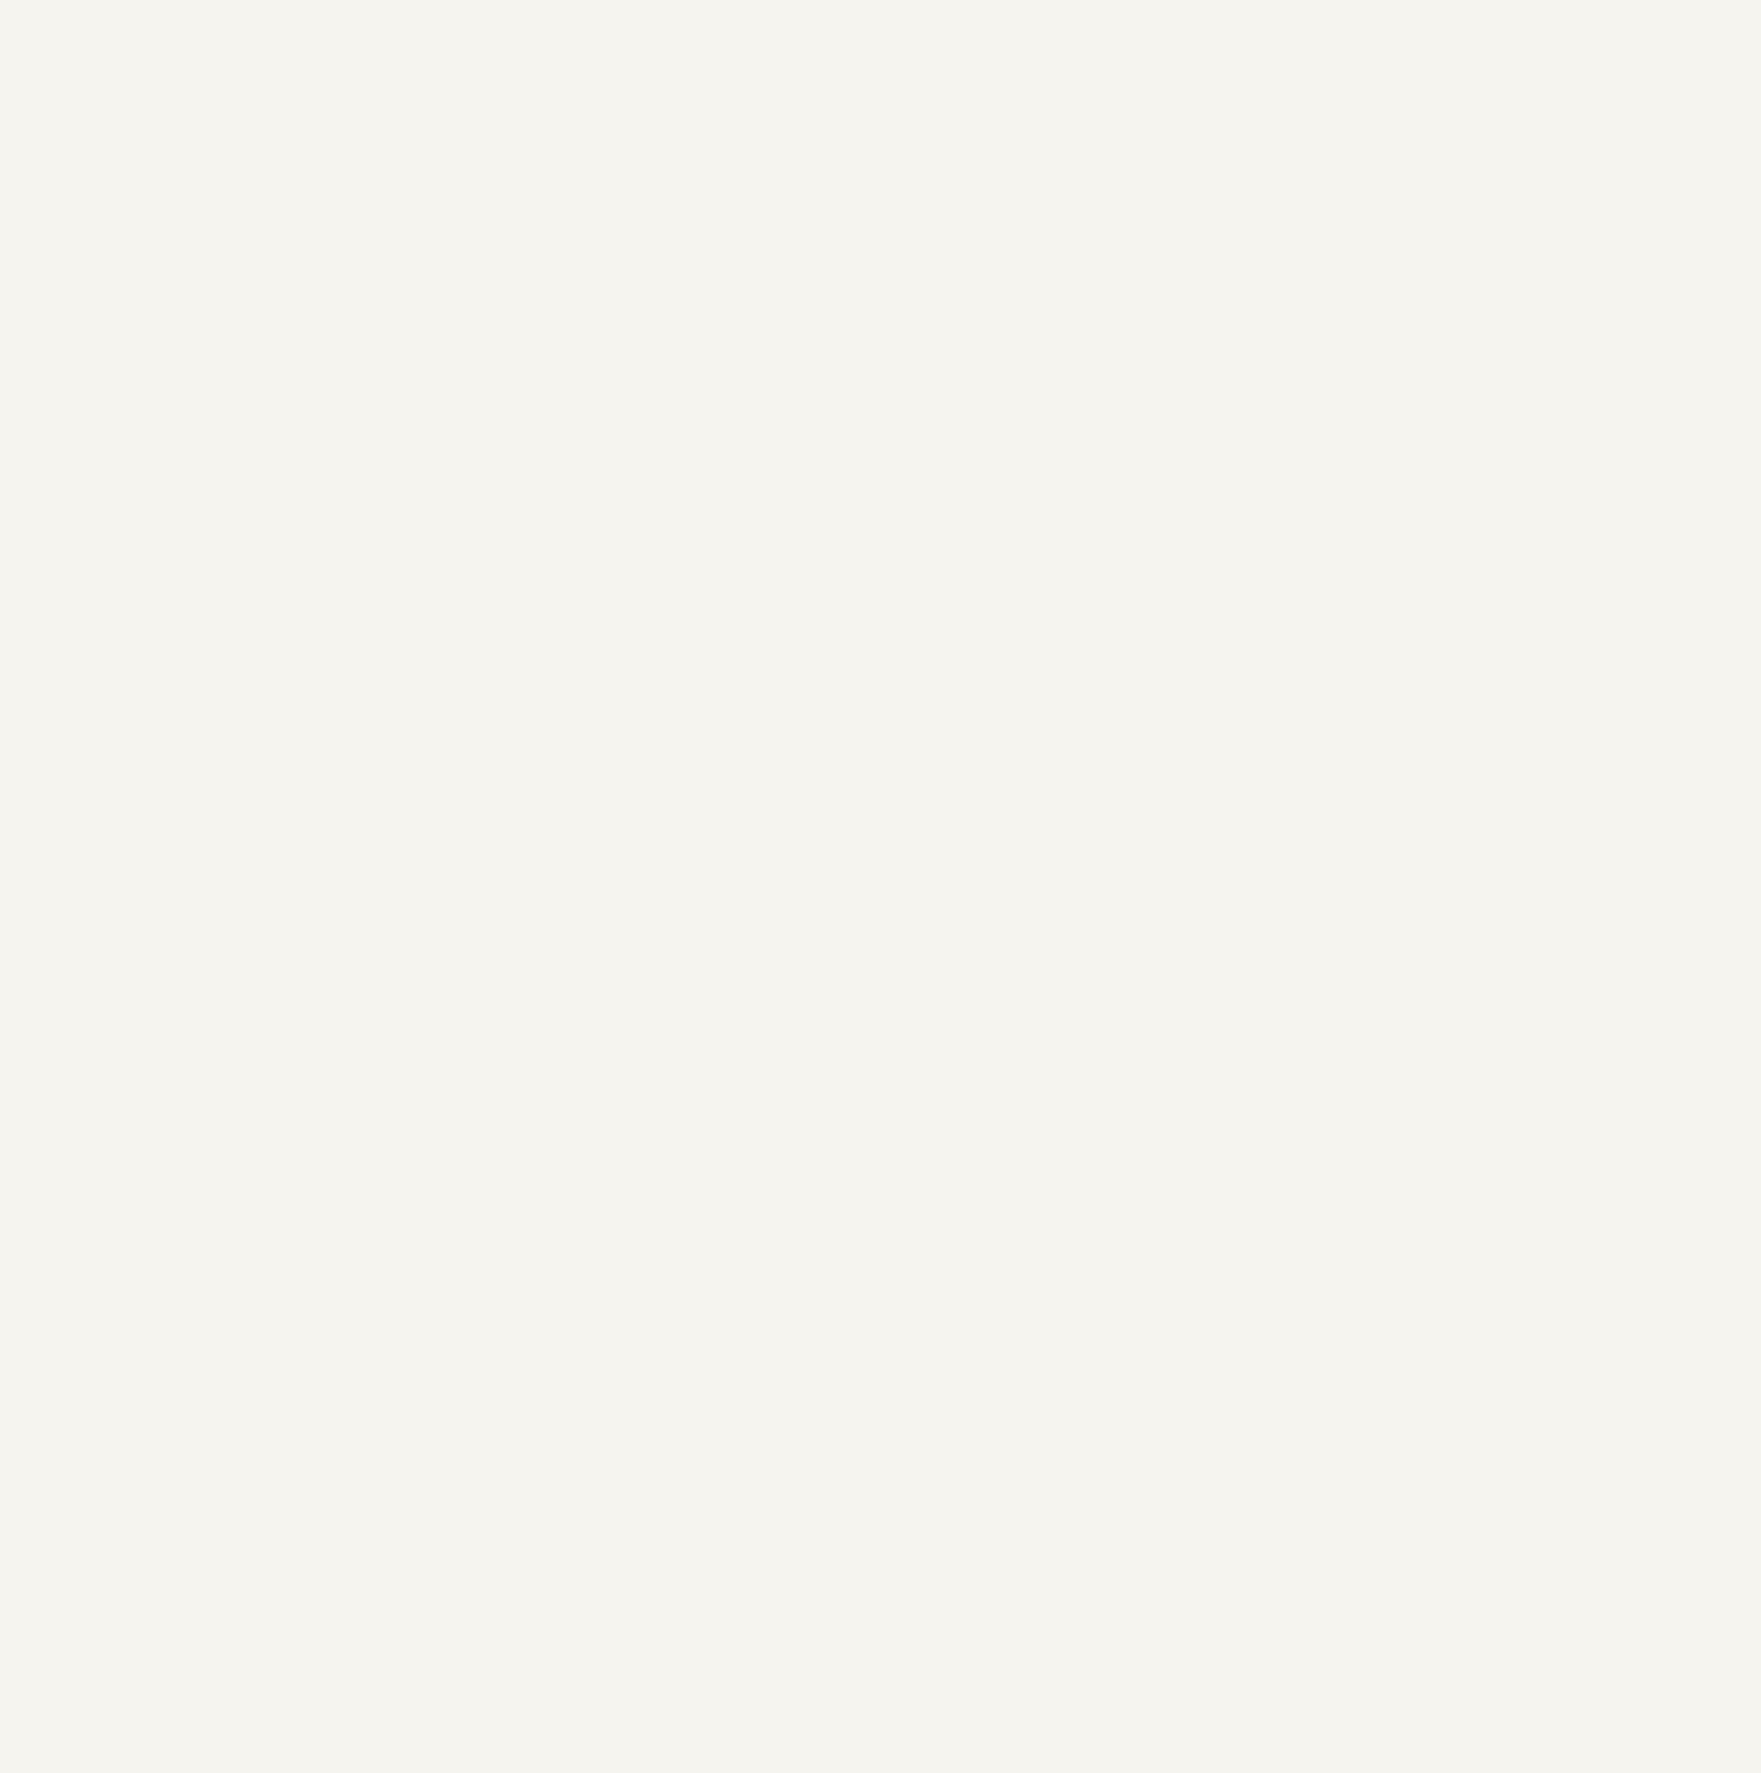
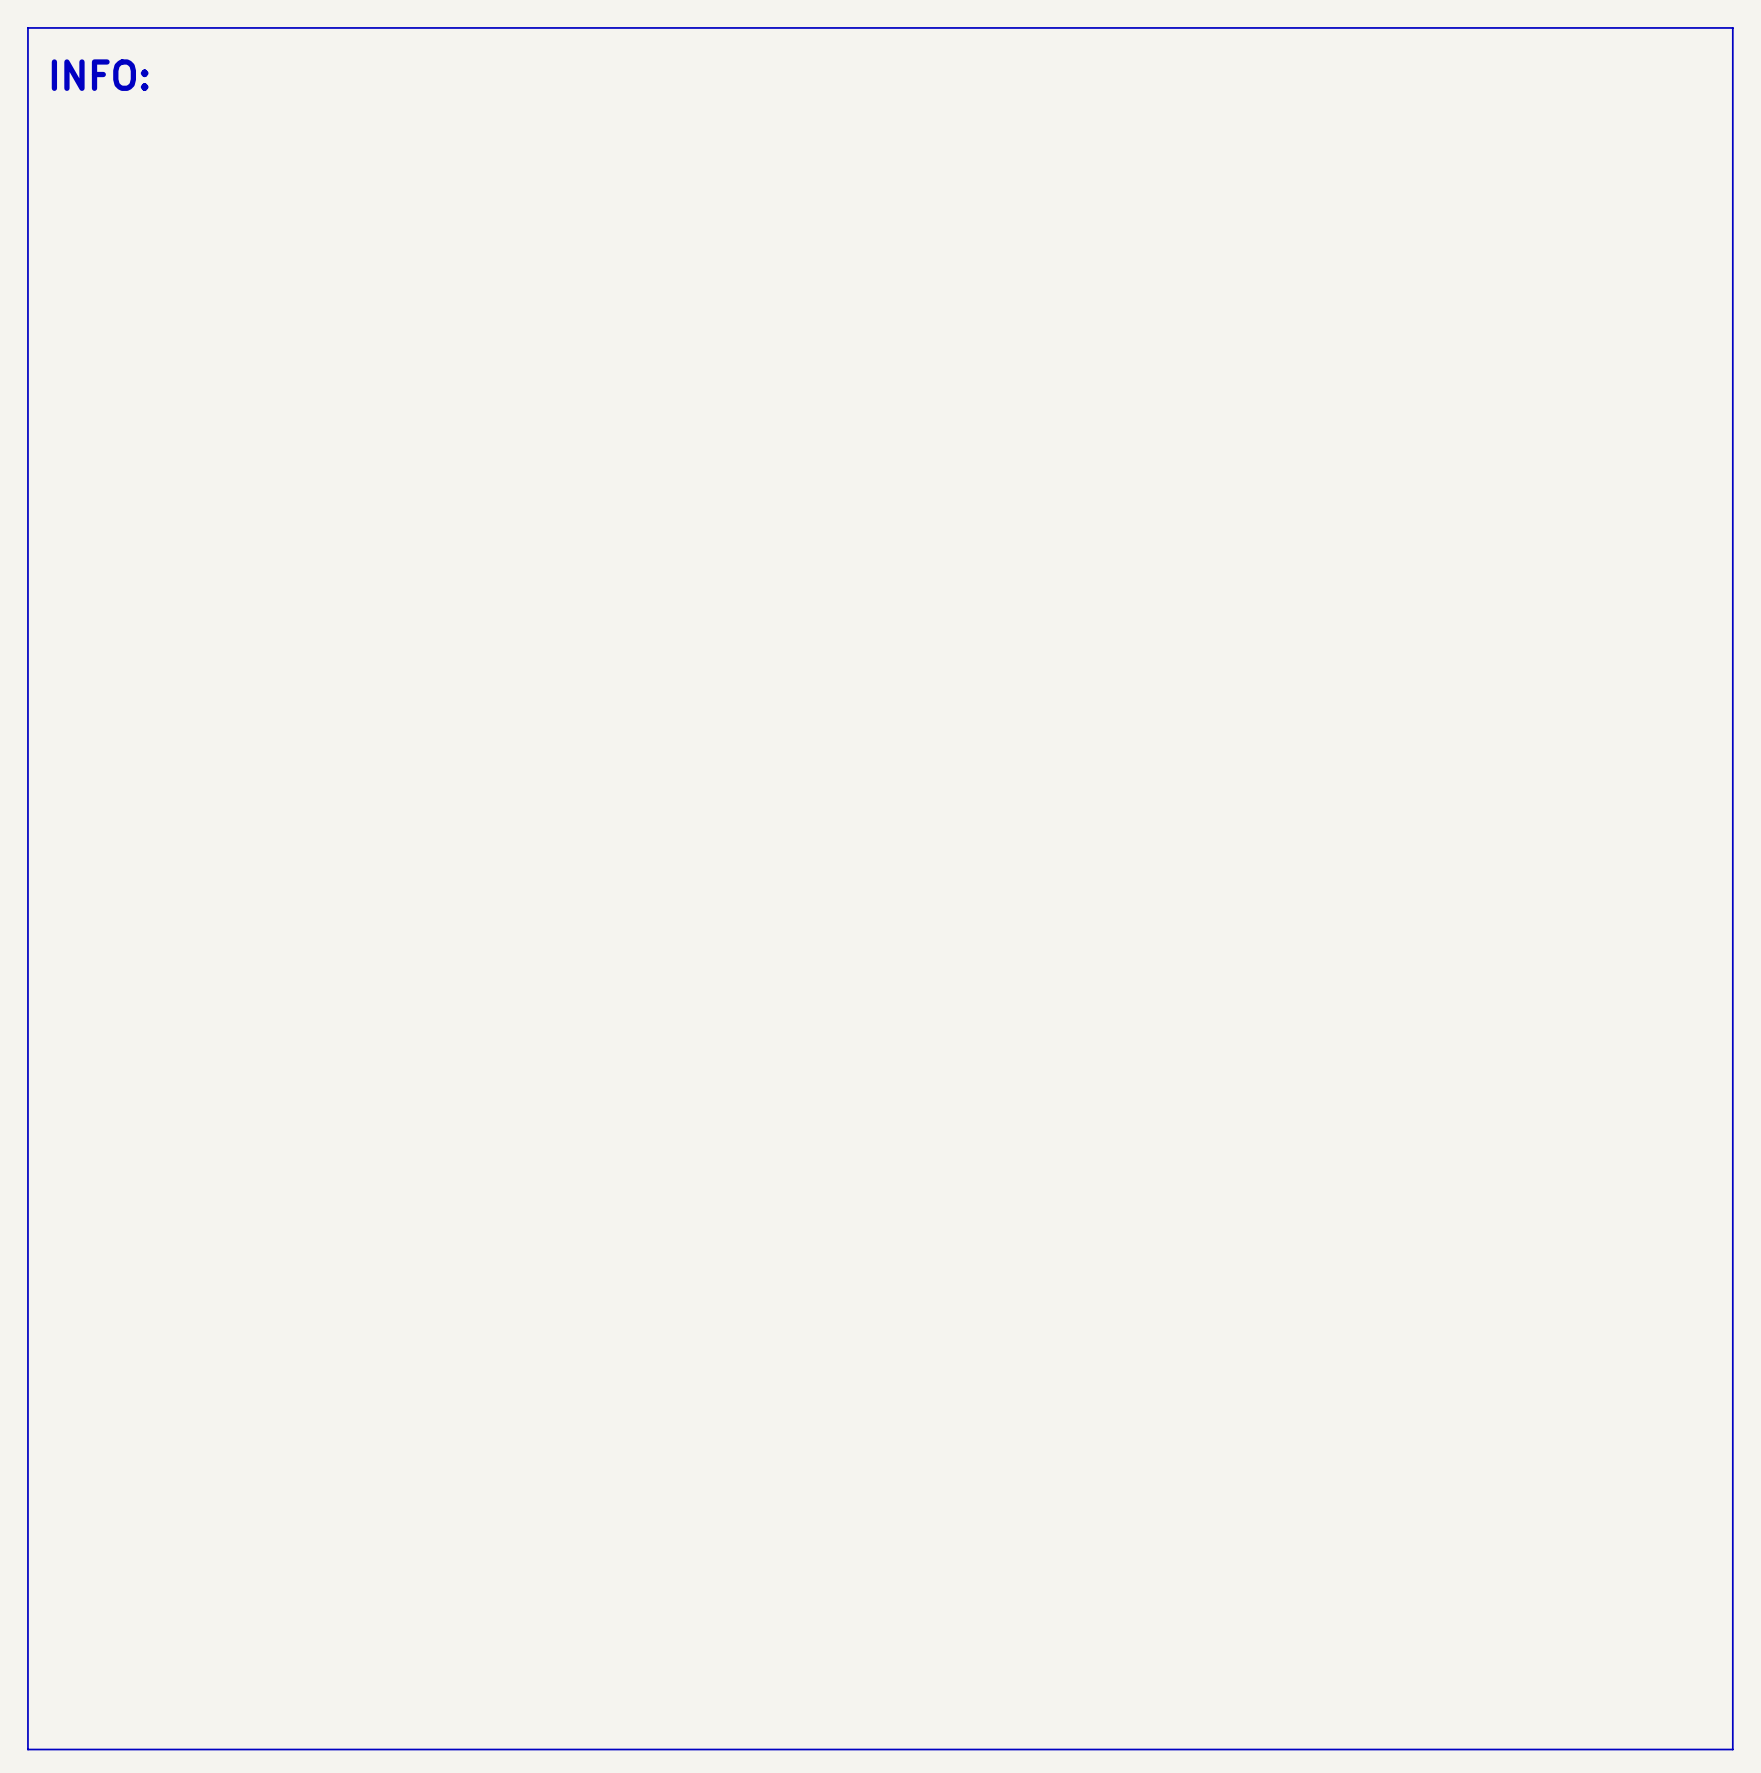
line: none -> (27, 27) (27, 1749) (1732, 1749) (1732, 27) (27, 27)
text: none -> INFO: (100, 75)

